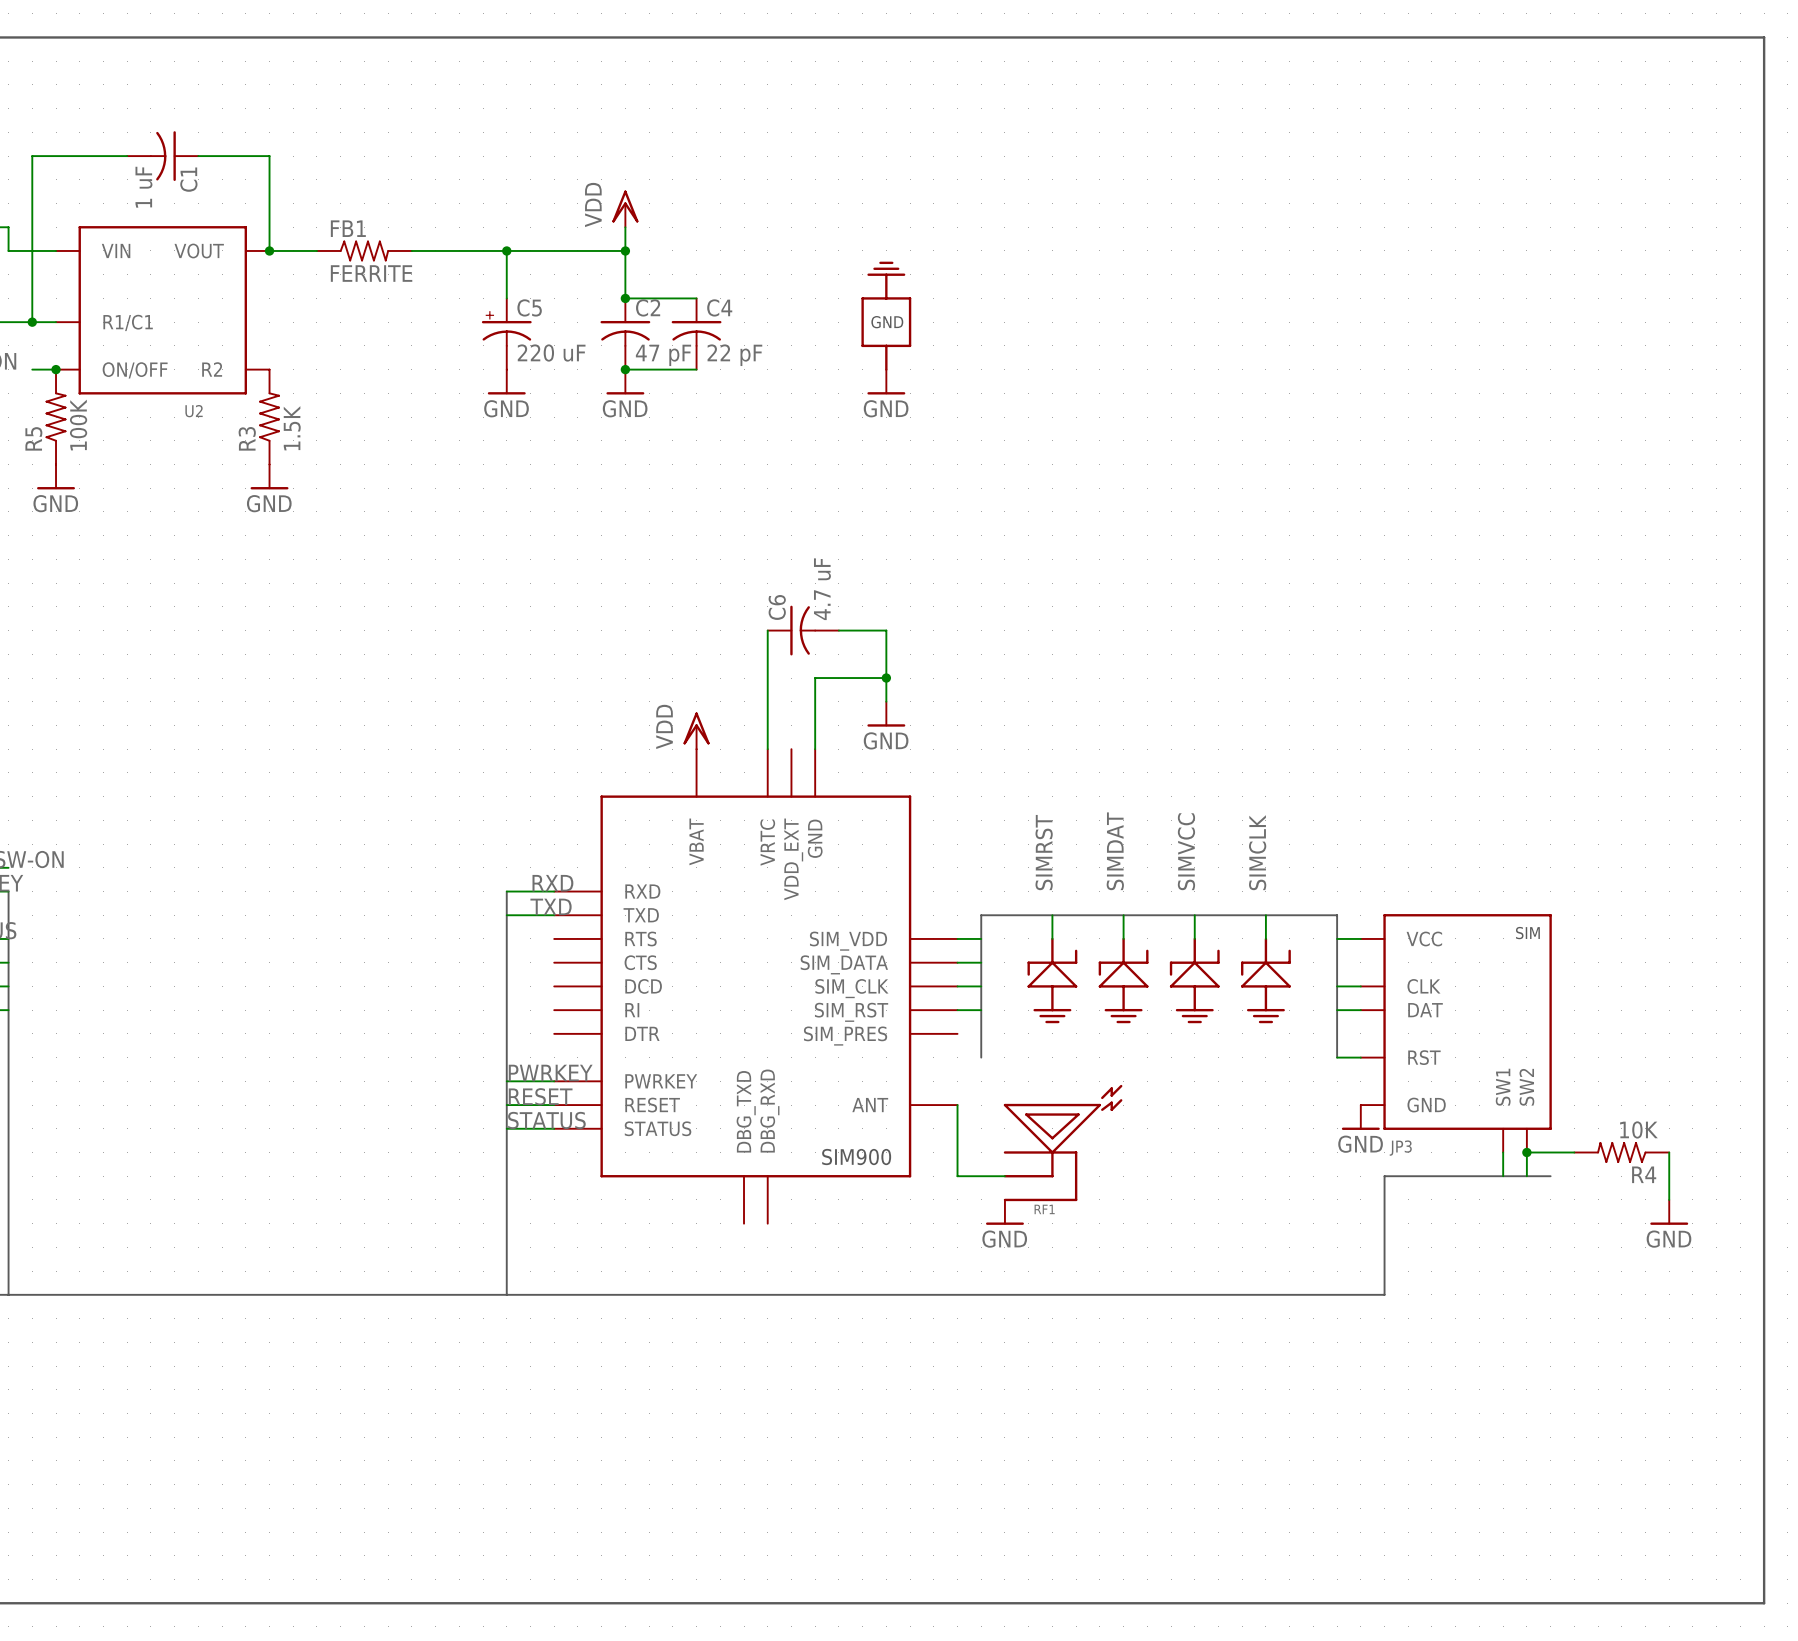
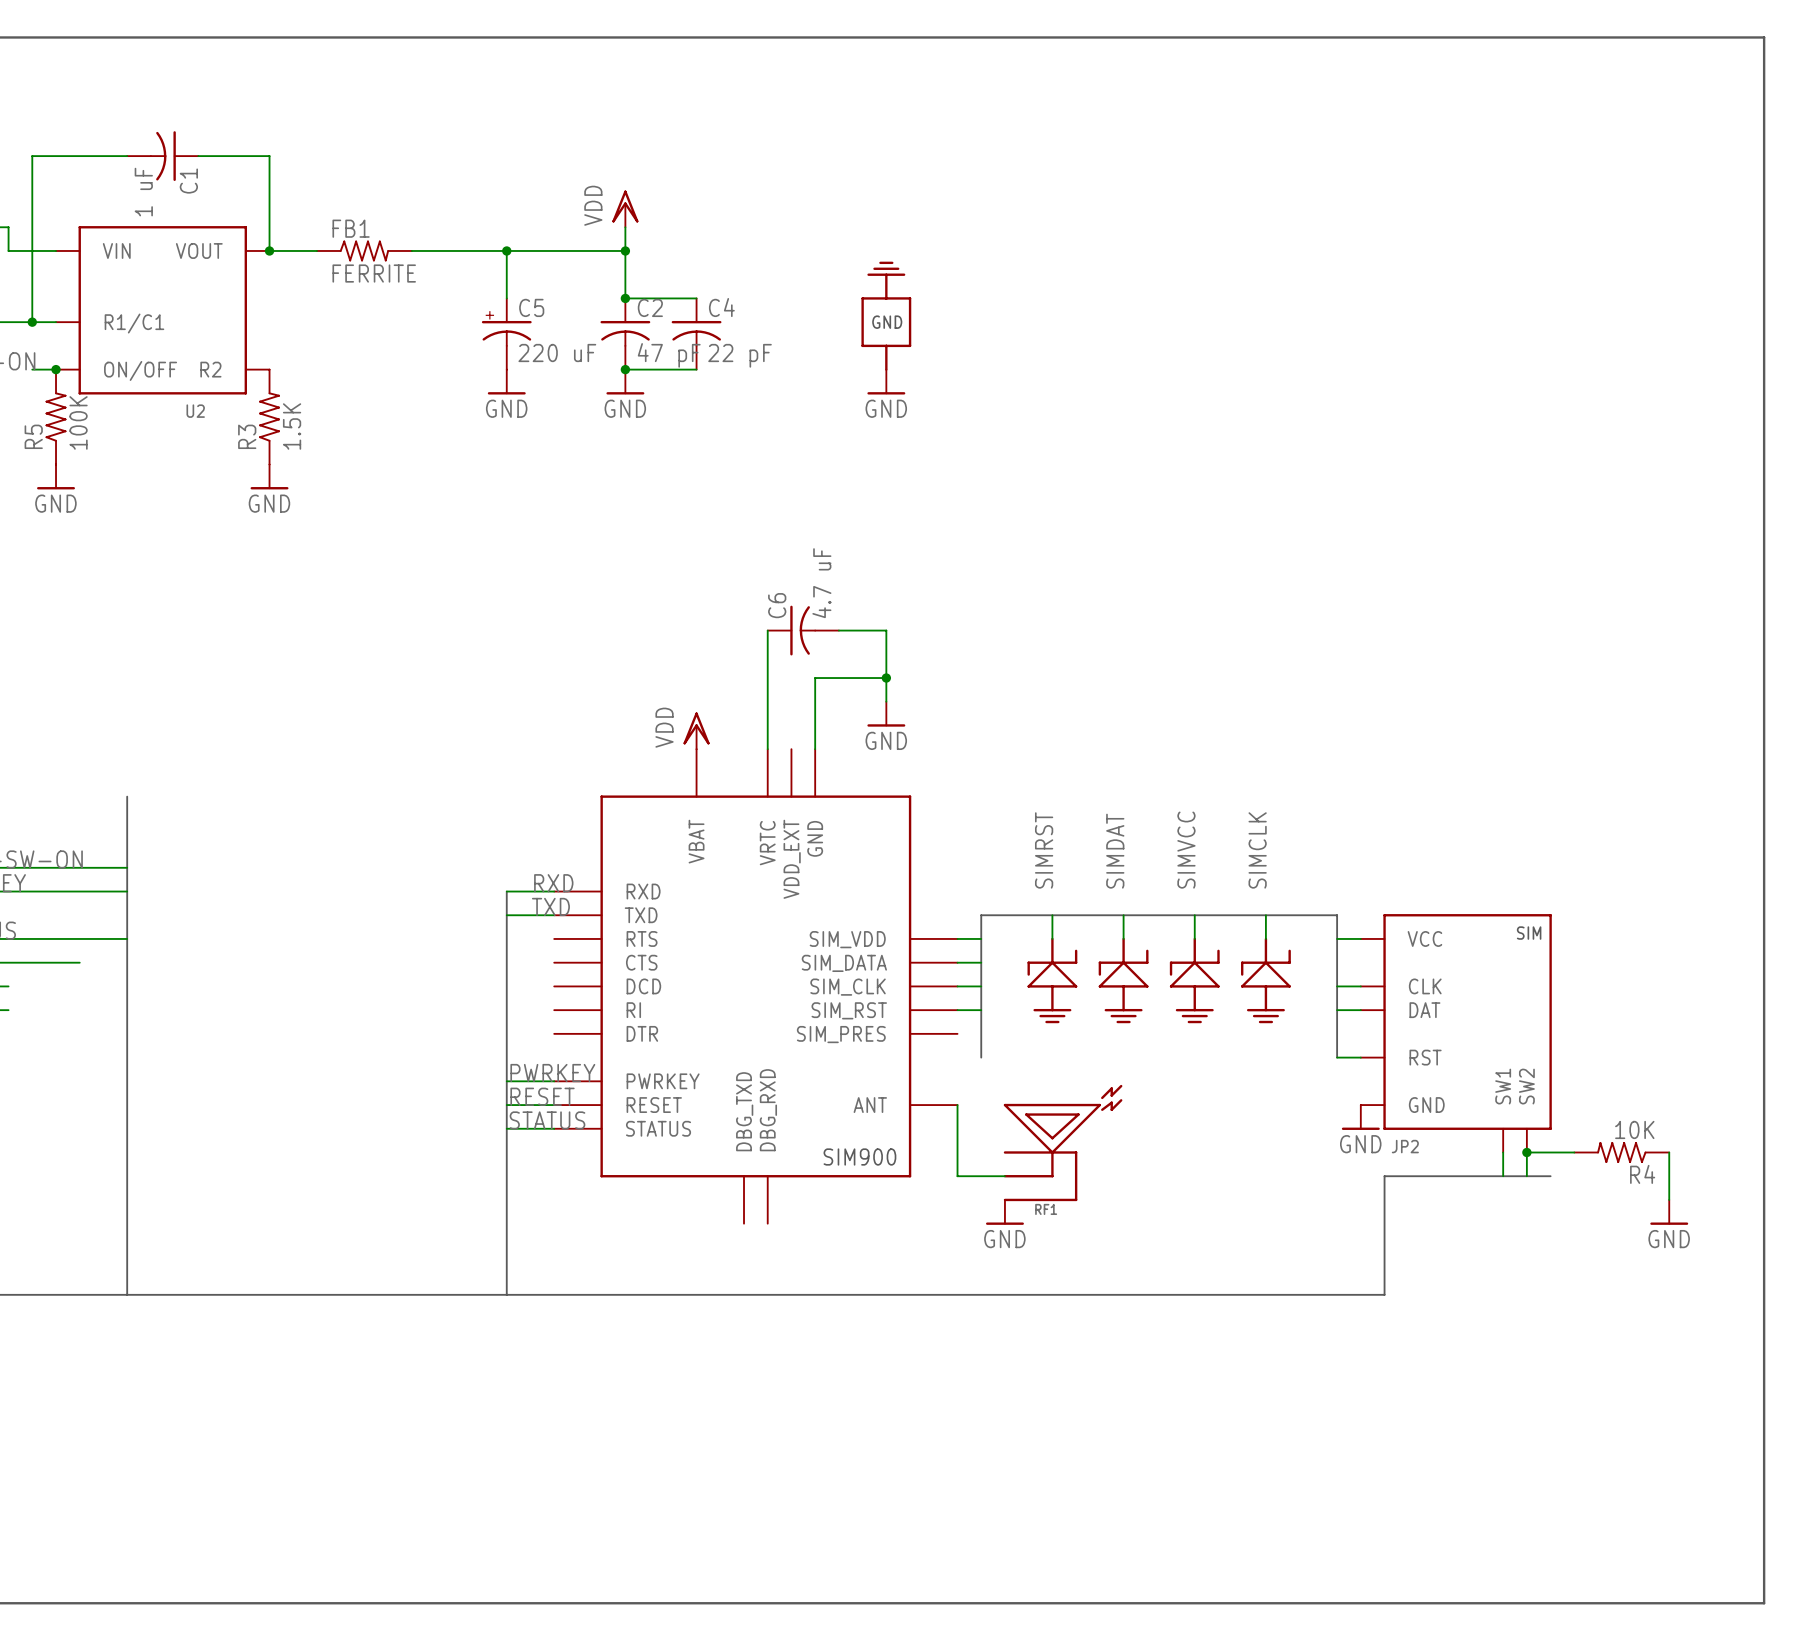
bus: none -> (127, 796) (127, 1294)
wire: none -> (8, 867) (127, 867)
bus: (8, 891) (8, 1294) -> none
wire: none -> (8, 891) (127, 891)
wire: none -> (8, 938) (127, 938)
wire: none -> (8, 962) (79, 962)
JP3 name: JP3 (1400, 1148) -> JP2 (1405, 1146)

